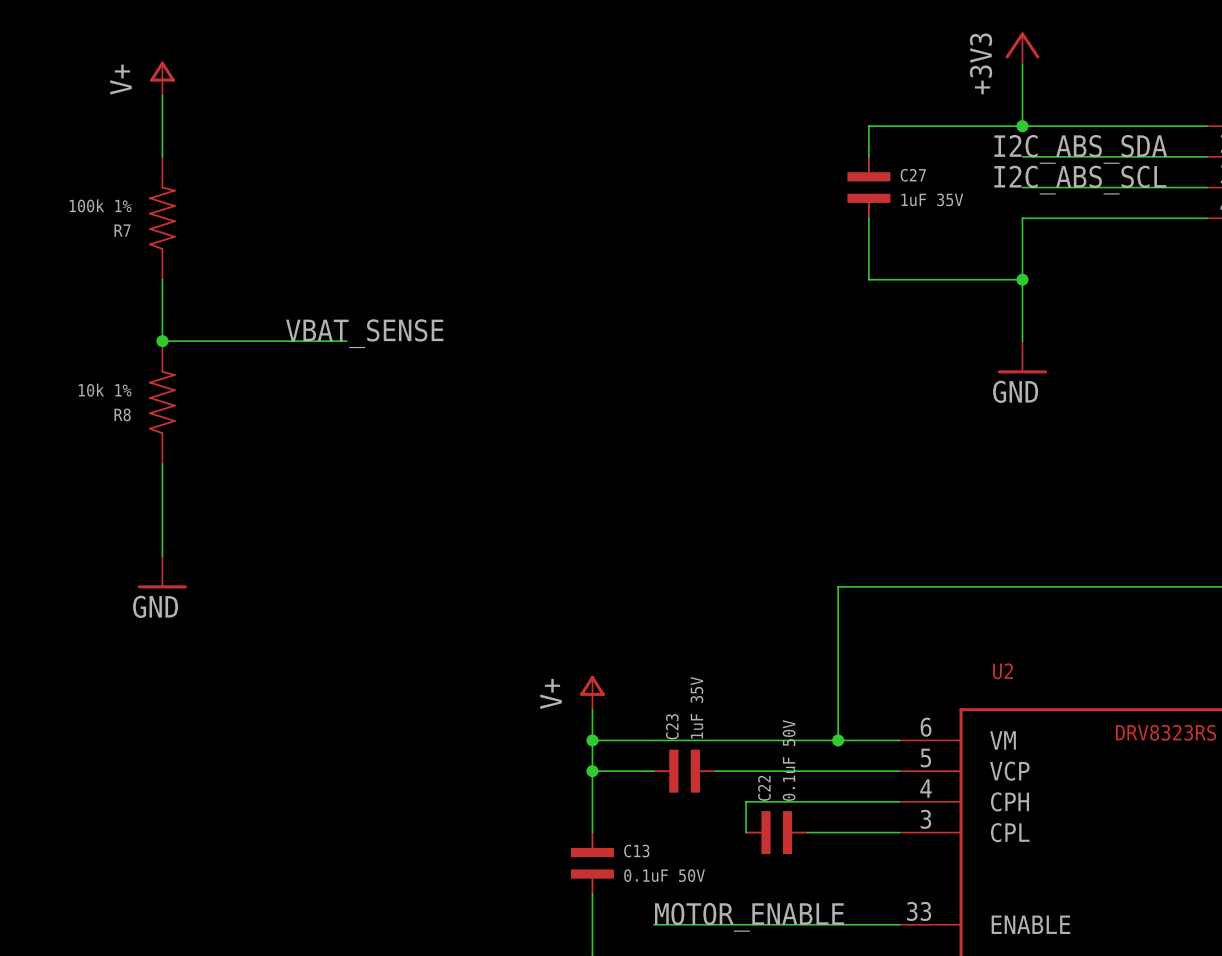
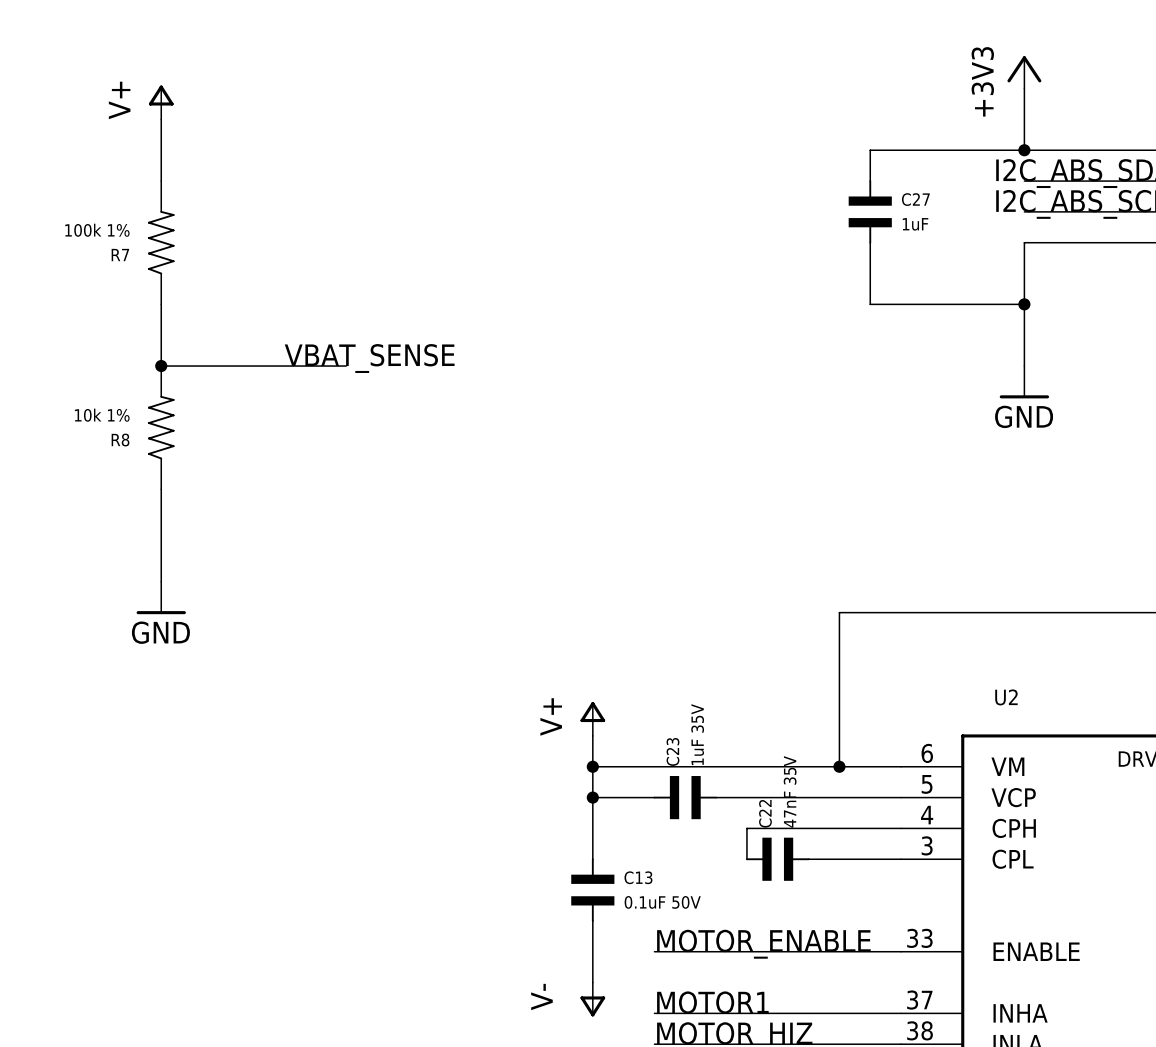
C27 value: 1uF 35V (932, 199) -> 1uF (915, 224)
C22 value: 0.1uF 50V (789, 760) -> 47nF 35V (790, 791)

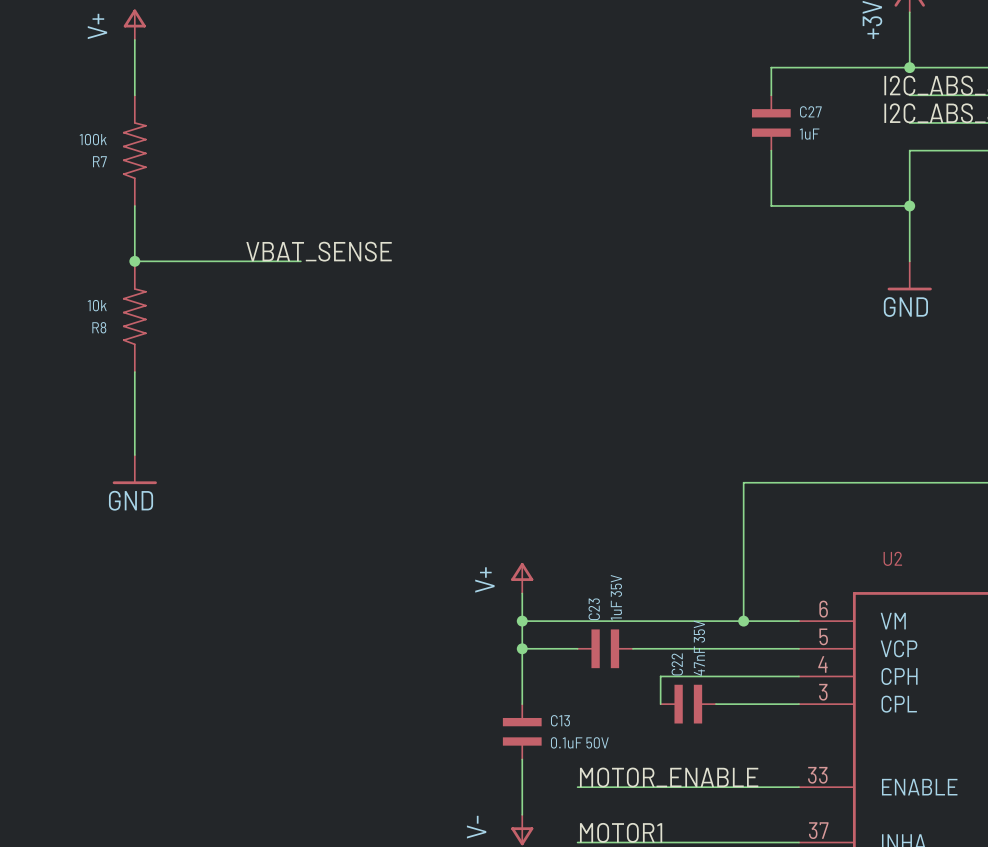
R7 value: 100k 1% (97, 230) -> 100k (93, 139)
R8 value: 10k 1% (102, 415) -> 10k (97, 305)

